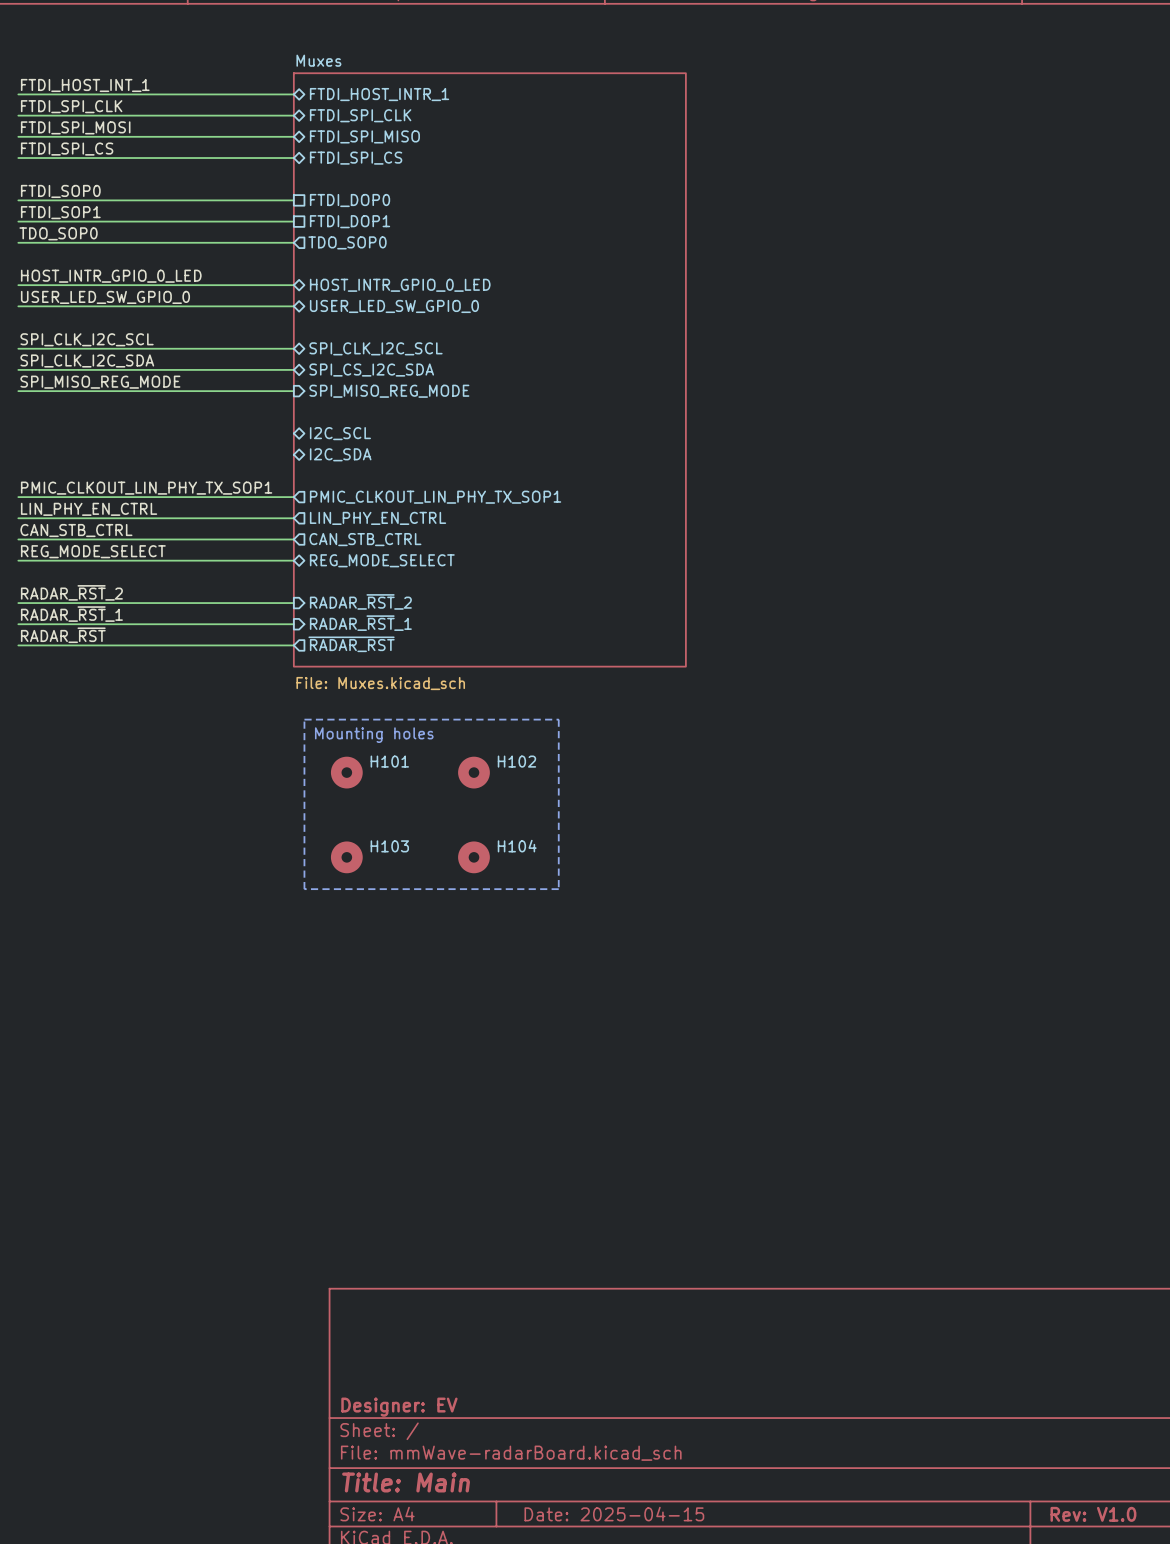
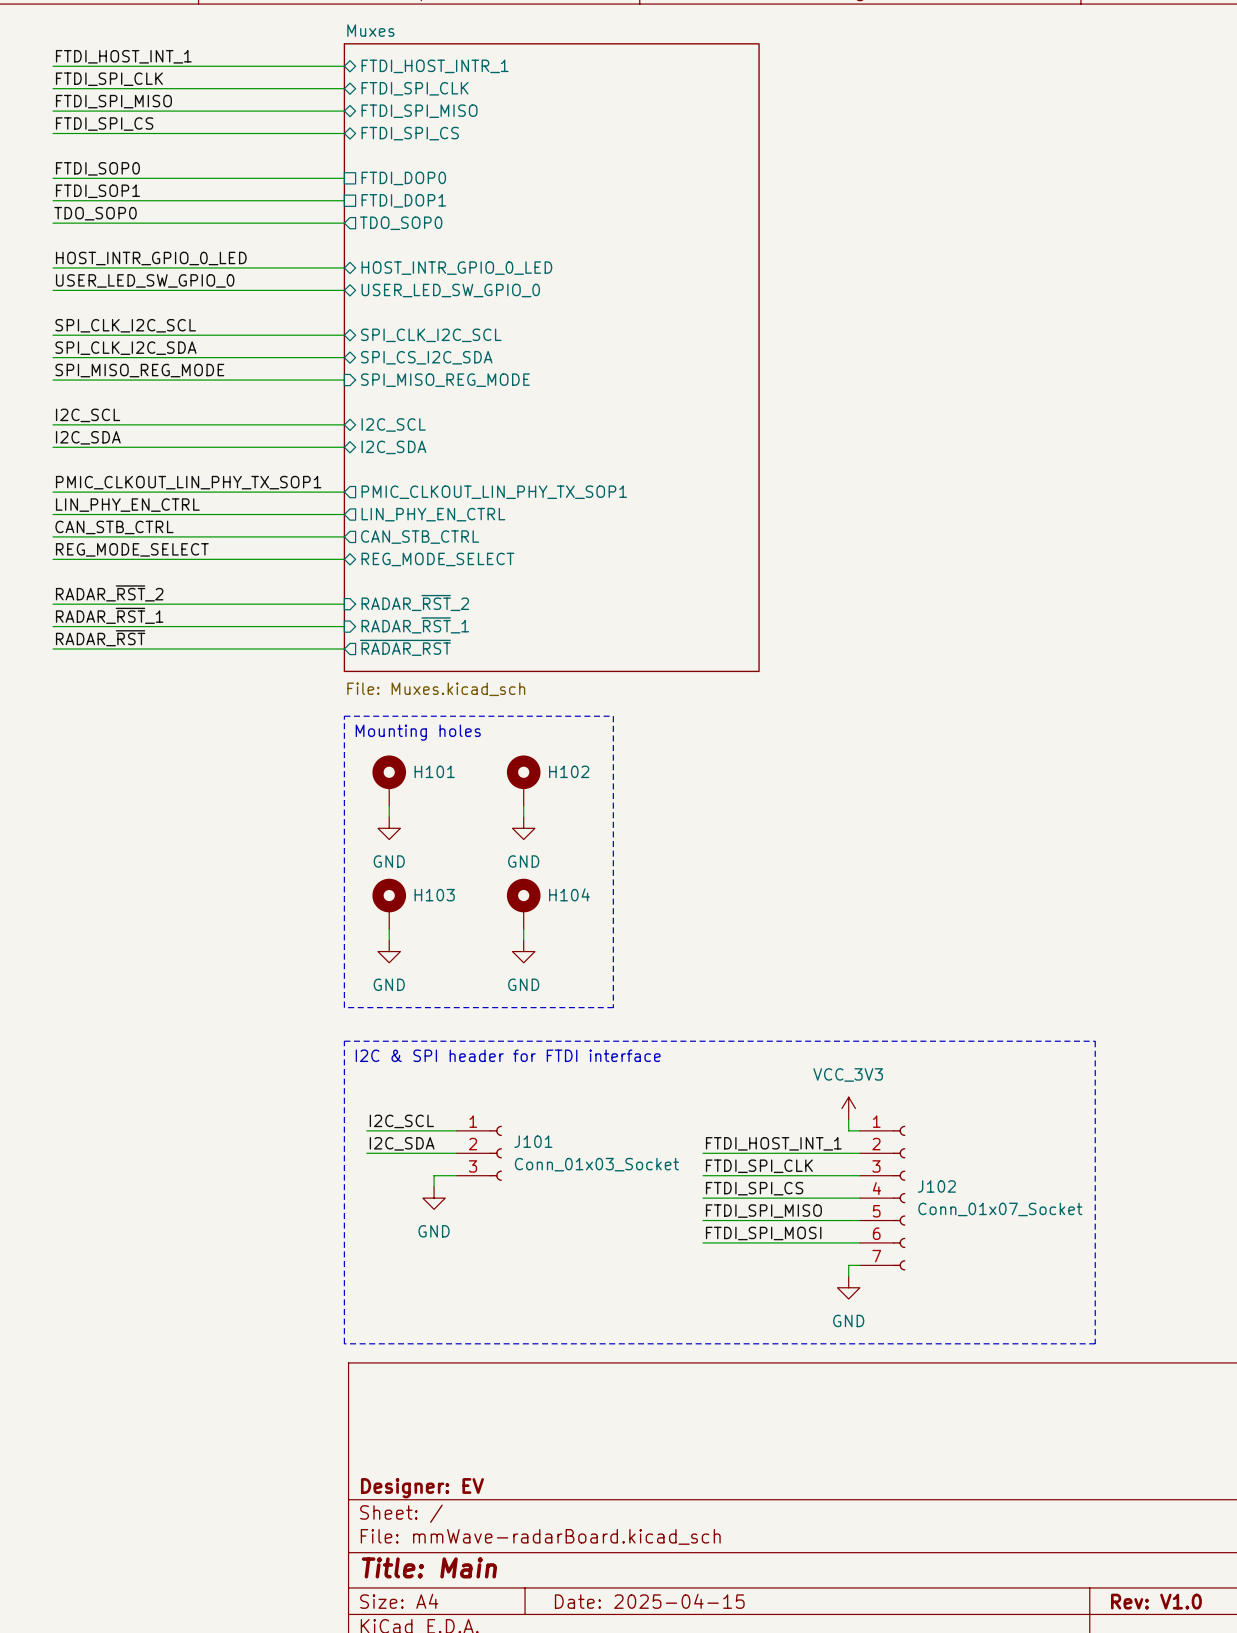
label position: FTDI_HOST_INT_1 (85, 85) -> FTDI_HOST_INT_1 (123, 56)
wire: (18, 94) (293, 94) -> (53, 66) (344, 66)
sheet pin position: FTDI_HOST_INTR_1 (379, 94) -> FTDI_HOST_INTR_1 (435, 66)
label: none -> FTDI_SPI_MISO (113, 101)
label position: FTDI_SPI_CLK (71, 106) -> FTDI_SPI_CLK (109, 79)
wire: (18, 115) (293, 115) -> (53, 88) (344, 88)
sheet pin position: FTDI_SPI_CLK (360, 115) -> FTDI_SPI_CLK (415, 88)
label: FTDI_SPI_MOSI (75, 127) -> none
wire: (18, 136) (293, 136) -> (53, 111) (344, 111)
sheet pin position: FTDI_SPI_MISO (364, 136) -> FTDI_SPI_MISO (419, 111)
label position: FTDI_SPI_CS (67, 149) -> FTDI_SPI_CS (104, 124)
wire: (18, 158) (293, 158) -> (53, 133) (344, 133)
sheet pin position: FTDI_SPI_CS (356, 158) -> FTDI_SPI_CS (410, 133)
label position: FTDI_SOP0 (60, 191) -> FTDI_SOP0 (97, 168)
wire: (18, 200) (293, 200) -> (53, 178) (344, 178)
sheet pin position: FTDI_DOP0 (350, 200) -> FTDI_DOP0 (403, 178)
label position: FTDI_SOP1 (60, 212) -> FTDI_SOP1 (97, 191)
wire: (18, 221) (293, 221) -> (53, 200) (344, 200)
sheet pin position: FTDI_DOP1 (350, 221) -> FTDI_DOP1 (403, 200)
label position: TDO_SOP0 (58, 233) -> TDO_SOP0 (95, 213)
wire: (18, 242) (293, 242) -> (53, 223) (344, 223)
sheet pin position: TDO_SOP0 (347, 242) -> TDO_SOP0 (401, 223)
label position: HOST_INTR_GPIO_0_LED (111, 276) -> HOST_INTR_GPIO_0_LED (151, 258)
wire: (18, 285) (293, 285) -> (53, 267) (344, 267)
sheet pin position: HOST_INTR_GPIO_0_LED (400, 285) -> HOST_INTR_GPIO_0_LED (456, 268)
label position: USER_LED_SW_GPIO_0 (105, 297) -> USER_LED_SW_GPIO_0 (145, 280)
wire: (18, 306) (293, 306) -> (53, 290) (344, 290)
sheet pin position: USER_LED_SW_GPIO_0 (394, 306) -> USER_LED_SW_GPIO_0 (450, 290)
label position: SPI_CLK_I2C_SCL (87, 339) -> SPI_CLK_I2C_SCL (125, 325)
wire: (18, 348) (293, 348) -> (53, 335) (344, 335)
sheet pin position: SPI_CLK_I2C_SCL (376, 348) -> SPI_CLK_I2C_SCL (431, 335)
label position: SPI_CLK_I2C_SDA (87, 360) -> SPI_CLK_I2C_SDA (125, 348)
wire: (18, 369) (293, 369) -> (53, 357) (344, 357)
sheet Muxes position: (489, 369) -> (551, 357)
sheet pin position: SPI_CS_I2C_SDA (371, 370) -> SPI_CS_I2C_SDA (426, 357)
label position: SPI_MISO_REG_MODE (100, 382) -> SPI_MISO_REG_MODE (139, 370)
wire: (18, 391) (293, 391) -> (53, 380) (344, 380)
sheet pin position: SPI_MISO_REG_MODE (389, 391) -> SPI_MISO_REG_MODE (445, 380)
label: none -> I2C_SCL (88, 415)
wire: none -> (53, 424) (344, 424)
label: none -> I2C_SDA (88, 437)
wire: none -> (53, 447) (344, 447)
sheet pin position: I2C_SCL (340, 433) -> I2C_SCL (393, 424)
sheet pin position: I2C_SDA (340, 454) -> I2C_SDA (393, 447)
label position: PMIC_CLKOUT_LIN_PHY_TX_SOP1 (146, 488) -> PMIC_CLKOUT_LIN_PHY_TX_SOP1 (188, 482)
wire: (18, 497) (293, 497) -> (53, 492) (344, 492)
sheet pin position: PMIC_CLKOUT_LIN_PHY_TX_SOP1 (435, 497) -> PMIC_CLKOUT_LIN_PHY_TX_SOP1 (494, 492)
label position: LIN_PHY_EN_CTRL (89, 509) -> LIN_PHY_EN_CTRL (127, 505)
wire: (18, 518) (293, 518) -> (53, 514) (344, 514)
sheet pin position: LIN_PHY_EN_CTRL (378, 518) -> LIN_PHY_EN_CTRL (433, 514)
label position: CAN_STB_CTRL (76, 530) -> CAN_STB_CTRL (114, 527)
wire: (18, 539) (293, 539) -> (53, 536) (344, 536)
sheet pin position: CAN_STB_CTRL (365, 539) -> CAN_STB_CTRL (420, 537)
label position: REG_MODE_SELECT (93, 551) -> REG_MODE_SELECT (132, 549)
wire: (18, 560) (293, 560) -> (53, 559) (344, 559)
sheet pin position: REG_MODE_SELECT (382, 560) -> REG_MODE_SELECT (437, 559)
label position: RADAR_~{RST}_2 (71, 592) -> RADAR_~{RST}_2 (109, 593)
sheet pin position: RADAR_~{RST}_2 (360, 601) -> RADAR_~{RST}_2 (415, 602)
wire: (18, 603) (293, 603) -> (53, 604) (344, 604)
label position: RADAR_~{RST}_1 (71, 614) -> RADAR_~{RST}_1 (109, 615)
sheet pin position: RADAR_~{RST}_1 (360, 623) -> RADAR_~{RST}_1 (415, 625)
wire: (18, 624) (293, 624) -> (53, 626) (344, 626)
label position: RADAR_~{RST} (63, 635) -> RADAR_~{RST} (100, 638)
sheet pin position: ~{RADAR_RST} (351, 644) -> ~{RADAR_RST} (405, 647)
wire: (18, 645) (293, 645) -> (53, 648) (344, 648)
line: (304, 719) (558, 719) (558, 889) (304, 889) (304, 719) -> (344, 716) (344, 1007) (613, 1007) (613, 716) (344, 716)
text position: Mounting holes (374, 735) -> Mounting holes (418, 732)
H101 symbol: [330, 756, 363, 789] -> [372, 755, 407, 806]
H102 symbol: [458, 756, 490, 789] -> [506, 755, 541, 806]
wire: none -> (389, 805) (389, 817)
wire: none -> (523, 805) (523, 817)
power symbol: none -> GND (389, 828)
power symbol: none -> GND (523, 828)
H103 symbol: [330, 841, 363, 874] -> [372, 878, 407, 930]
H104 symbol: [458, 841, 490, 874] -> [506, 878, 541, 930]
wire: none -> (389, 929) (389, 940)
wire: none -> (523, 929) (523, 940)
power symbol: none -> GND (389, 951)
power symbol: none -> GND (523, 951)
line: none -> (344, 1041) (344, 1343) (1095, 1343) (1095, 1041) (344, 1041)
text: none -> I2C & SPI header for FTDI interface (508, 1055)
power symbol: none -> VCC_3V3 (848, 1108)
wire: none -> (848, 1119) (848, 1130) (859, 1130)
label: none -> I2C_SCL (401, 1121)
wire: none -> (366, 1130) (456, 1130)
label: none -> I2C_SDA (402, 1143)
label: none -> FTDI_HOST_INT_1 (773, 1143)
wire: none -> (366, 1153) (456, 1153)
J101: none -> Conn_01x03_Socket (479, 1153)
wire: none -> (703, 1153) (859, 1153)
label: none -> FTDI_SPI_CLK (759, 1166)
wire: none -> (456, 1175) (434, 1175) (434, 1186)
wire: none -> (703, 1175) (859, 1175)
label: none -> FTDI_SPI_CS (754, 1188)
power symbol: none -> GND (434, 1198)
wire: none -> (703, 1198) (859, 1198)
J102: none -> Conn_01x07_Socket (882, 1198)
label: none -> FTDI_SPI_MISO (763, 1211)
wire: none -> (703, 1220) (859, 1220)
label: none -> FTDI_SPI_MOSI (763, 1233)
wire: none -> (703, 1242) (859, 1242)
wire: none -> (859, 1265) (848, 1265) (848, 1276)
power symbol: none -> GND (848, 1287)

